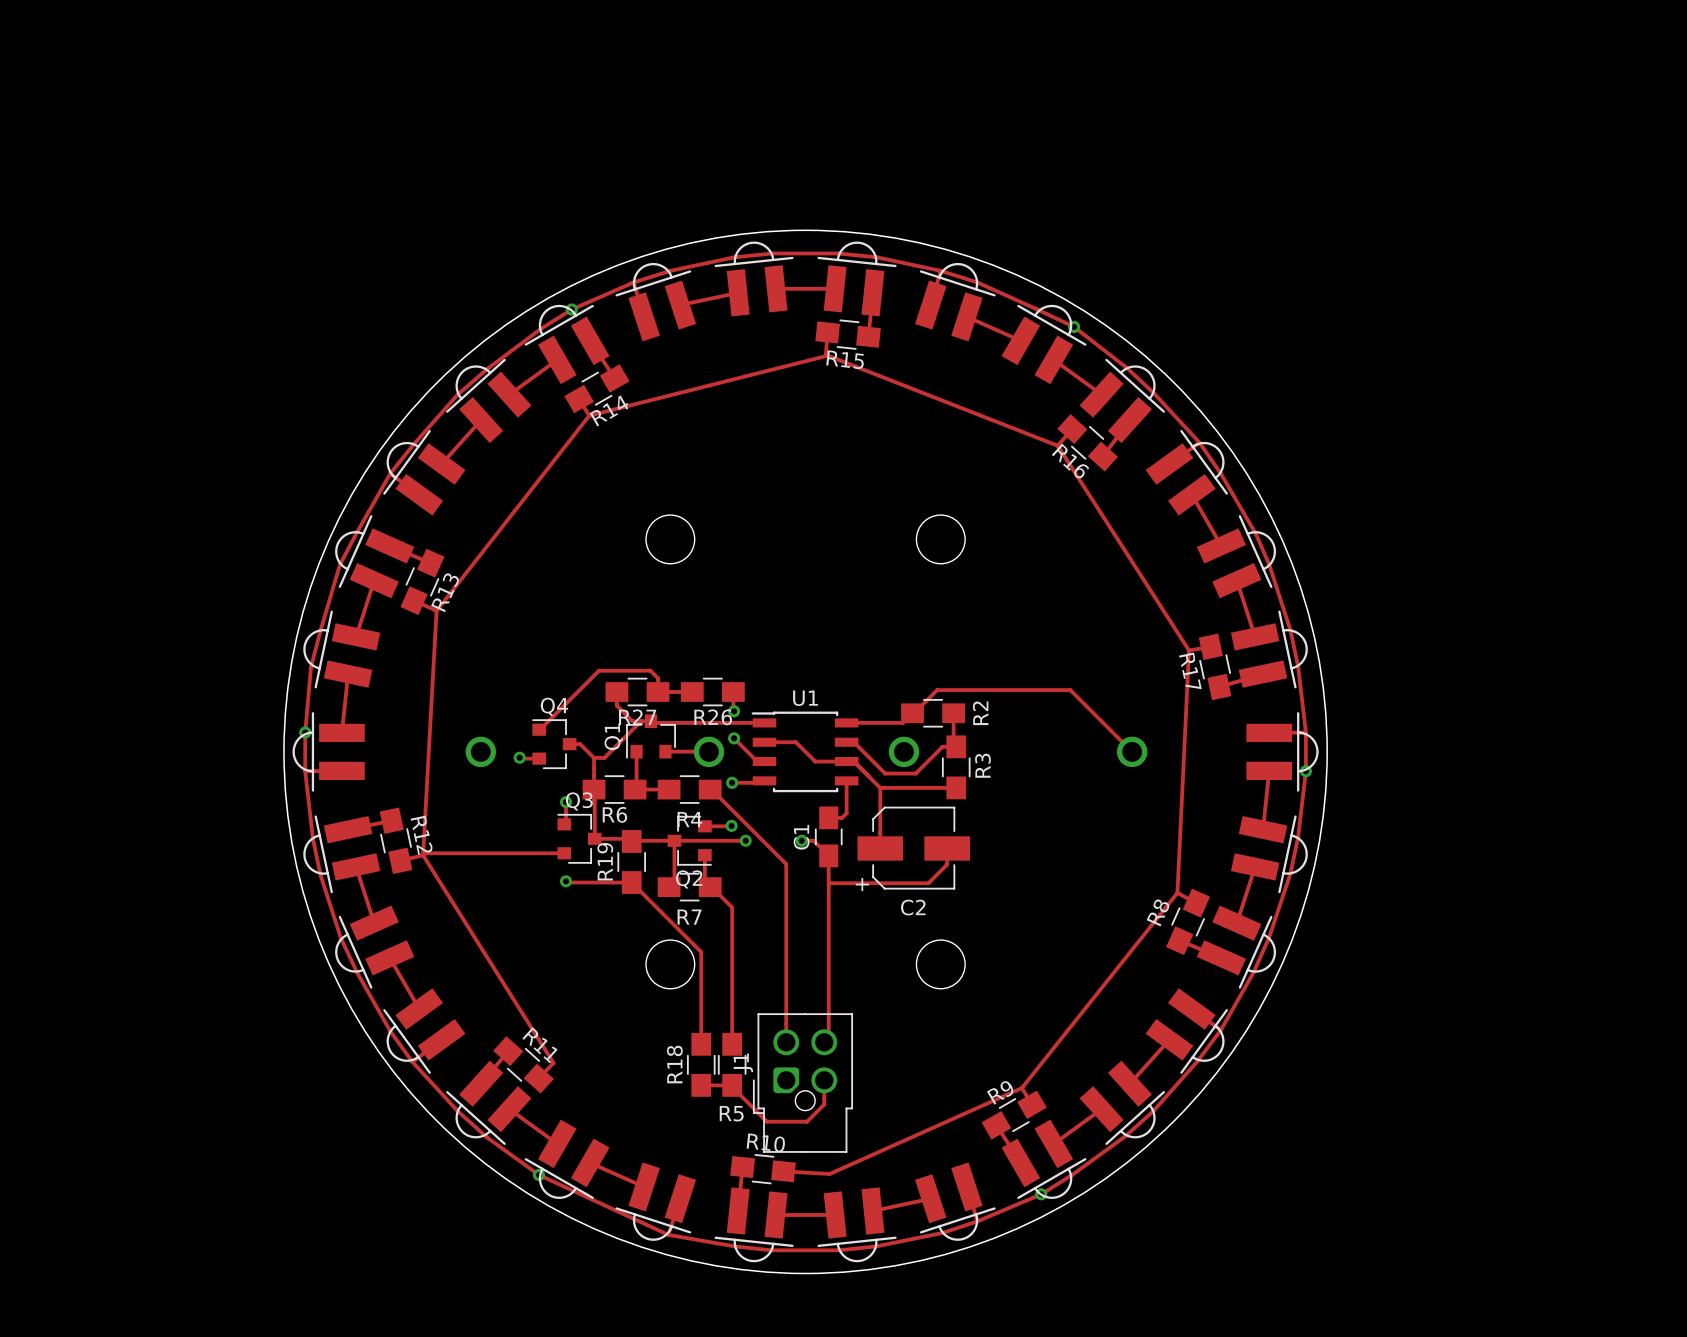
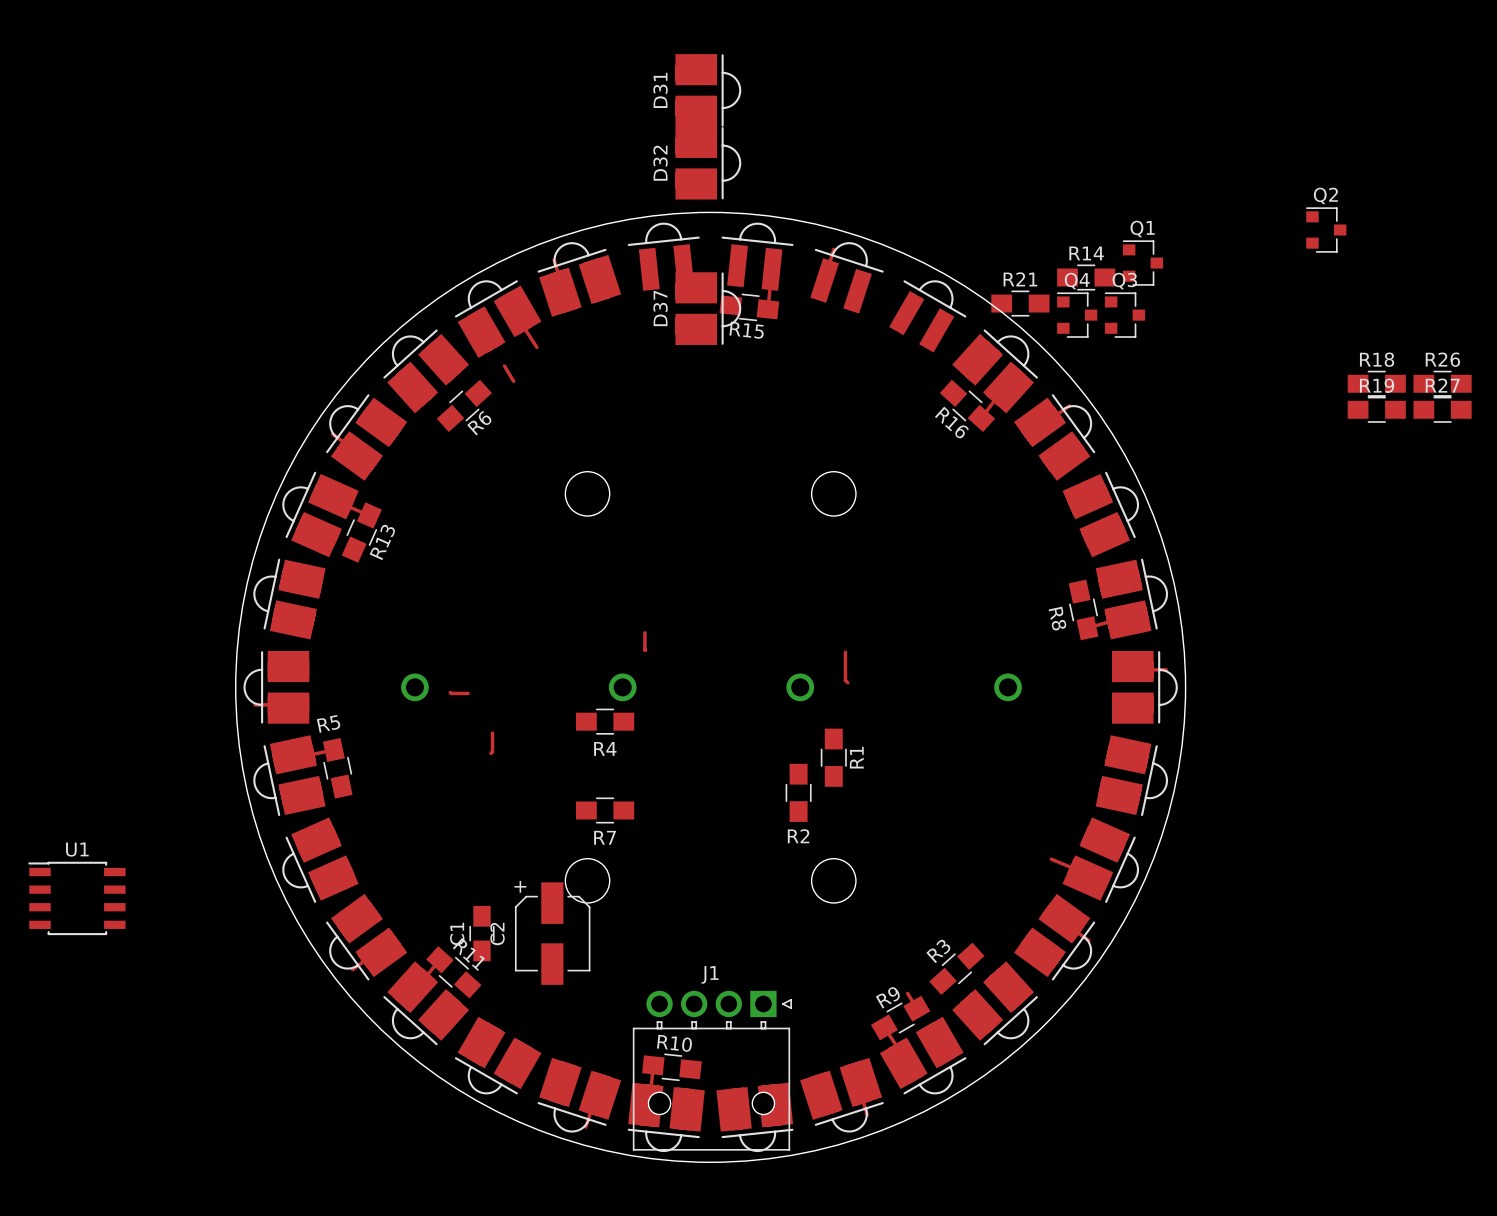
D31: none -> (708, 90)
D32: none -> (708, 163)
track: (772, 253) (734, 257) (670, 270) (633, 282) (571, 309) (540, 328) (486, 369) (457, 394) (390, 473) (340, 564) (311, 666) (305, 732) (305, 771) (312, 838) (320, 875) (340, 938) (357, 973) (390, 1031) (412, 1061) (457, 1111) (486, 1137) (538, 1174) (668, 1234) (735, 1246) (771, 1250) (839, 1250) (876, 1246) (942, 1232) (977, 1221) (1041, 1194) (1072, 1174) (1125, 1136) (1153, 1111) (1197, 1060) (1220, 1030) (1253, 972) (1269, 937) (1290, 873) (1298, 836) (1305, 771) (1305, 732) (1298, 666) (1290, 630) (1269, 564) (1255, 533) (1220, 473) (1199, 442) (1153, 392) (1126, 367) (1074, 326) (977, 282) (940, 270) (877, 257) (838, 253) (772, 253) -> none
part footprint: [615, 262, 697, 342] -> [537, 242, 622, 317]
track: (776, 288) (835, 288) -> none
track: (738, 292) (680, 305) -> none
part footprint: [524, 304, 610, 385] -> [454, 280, 542, 358]
via: (571, 309) -> none
track: (966, 316) (1020, 340) -> none
via: (1074, 326) -> none
R21: none -> (1020, 303)
track: (827, 332) (825, 354) (1057, 445) -> none
D37: none -> (708, 308)
track: (827, 355) (589, 415) (436, 610) -> none
part footprint: [446, 358, 532, 444] -> [383, 329, 470, 414]
part footprint: [1079, 358, 1166, 444] -> [952, 329, 1038, 414]
track: (557, 359) (509, 394) -> none
track: (1053, 359) (1101, 394) -> none
R14 rotation: 0° (596, 388) -> 30° clockwise (1086, 277)
R14 position: (596, 388) -> (1086, 277)
R14 name position: R14 (609, 410) -> R14 (1086, 253)
track: (481, 420) (441, 464) -> none
part footprint: [383, 429, 466, 516] -> [326, 394, 408, 481]
track: (1072, 429) (1057, 445) -> none
part footprint: [1145, 429, 1228, 516] -> [1014, 394, 1096, 481]
track: (1057, 445) (1189, 650) -> none
track: (1191, 494) (1221, 545) -> none
part footprint: [335, 515, 415, 599] -> [282, 471, 359, 558]
part footprint: [1196, 515, 1277, 599] -> [1062, 471, 1140, 558]
track: (374, 580) (356, 636) -> none
track: (1236, 580) (1255, 636) -> none
track: (414, 600) (436, 610) -> none
part footprint: [303, 610, 381, 689] -> [253, 558, 326, 640]
track: (436, 610) (423, 855) -> none
part footprint: [1230, 610, 1308, 689] -> [1095, 558, 1169, 640]
track: (1210, 646) (1189, 650) -> none
track: (1189, 650) (1177, 892) -> none
R17 name: R17 (1190, 670) -> R8 (1057, 618)
track: (348, 674) (341, 732) -> none
track: (616, 692) (616, 705) (632, 721) (764, 722) -> none
R27 position: (637, 692) -> (1442, 409)
track: (692, 692) (658, 692) (658, 678) (650, 670) (598, 670) (539, 729) -> none
R26 position: (712, 692) -> (1442, 383)
via: (734, 711) -> none
part footprint: [292, 712, 365, 792] -> [243, 650, 310, 724]
part footprint: [1246, 712, 1319, 792] -> [1112, 650, 1178, 724]
R2 rotation: 0° (933, 713) -> 90° clockwise (798, 792)
R2 position: (933, 713) -> (798, 792)
R27 name position: R27 (637, 717) -> R27 (1442, 385)
R26 name position: R26 (713, 717) -> R26 (1442, 359)
track: (641, 721) (604, 757) (594, 757) -> none
track: (846, 722) (902, 722) (937, 690) (1070, 690) (1132, 751) -> none
via: (305, 732) -> none
Q1 rotation: 0° (651, 736) -> 90° clockwise (1142, 263)
Q1 position: (651, 736) -> (1142, 263)
via: (734, 738) -> none
track: (736, 738) (757, 761) (764, 761) -> none
track: (764, 742) (795, 742) (815, 761) (853, 761) (880, 787) (880, 848) -> none
track: (846, 742) (853, 742) (885, 773) (915, 773) (942, 746) (956, 746) (956, 748) -> none
Q4 position: (554, 744) -> (1077, 315)
track: (569, 744) (580, 744) (594, 757) -> none
track: (636, 751) (635, 789) (669, 789) -> none
track: (665, 751) (708, 751) -> none
U1 position: (805, 751) -> (76, 898)
via: (519, 757) -> none
track: (594, 757) (594, 803) -> none
R3 name position: R3 (982, 765) -> R3 (938, 951)
R3 rotation: 0° (956, 767) -> 48° clockwise (956, 968)
R3 position: (956, 767) -> (956, 968)
track: (1269, 770) (1263, 829) -> none
via: (1305, 771) -> none
track: (764, 780) (762, 782) (732, 782) -> none
track: (846, 780) (846, 813) (842, 817) (828, 817) -> none
via: (732, 782) -> none
track: (880, 787) (956, 787) -> none
track: (594, 789) (594, 838) (629, 838) (631, 841) -> none
R6 rotation: 0° (614, 789) -> 42° counterclockwise (464, 405)
R6 position: (614, 789) -> (464, 405)
track: (710, 789) (786, 864) (786, 1042) -> none
via: (566, 802) -> none
part footprint: [303, 815, 381, 894] -> [253, 735, 326, 817]
part footprint: [1230, 815, 1308, 894] -> [1095, 735, 1169, 817]
track: (731, 825) (704, 826) -> none
via: (731, 825) -> none
R1: none -> (833, 757)
R12 name: R12 (421, 835) -> R5 (328, 723)
C1 position: (828, 836) -> (481, 933)
Q3 position: (579, 838) -> (1124, 315)
track: (631, 840) (745, 840) -> none
track: (674, 840) (674, 881) (669, 887) -> none
Q2 rotation: 0° (689, 840) -> 180° (1326, 230)
Q2 position: (689, 840) -> (1326, 230)
via: (745, 840) -> none
track: (801, 840) (813, 840) (828, 855) (828, 1037) (824, 1042) -> none
via: (801, 840) -> none
C2 rotation: 0° (913, 848) -> 90° clockwise (552, 933)
C2 position: (913, 848) -> (552, 933)
track: (947, 848) (947, 864) (928, 883) (828, 883) -> none
track: (564, 853) (425, 853) (423, 855) -> none
track: (423, 855) (400, 860) -> none
track: (423, 855) (553, 1062) (538, 1078) -> none
track: (704, 855) (704, 881) (732, 907) (732, 1044) -> none
R19 rotation: 0° (631, 862) -> 90° clockwise (1376, 409)
R19 position: (631, 862) -> (1376, 409)
track: (356, 866) (374, 923) -> none
track: (1255, 866) (1236, 923) -> none
track: (566, 881) (631, 882) (701, 952) (701, 1044) -> none
via: (566, 881) -> none
track: (1177, 892) (1196, 903) -> none
track: (1177, 892) (1021, 1088) (829, 1174) (783, 1171) -> none
part footprint: [335, 905, 415, 989] -> [282, 817, 359, 903]
part footprint: [1196, 905, 1277, 989] -> [1062, 817, 1140, 903]
R8: (1188, 921) -> none
track: (389, 957) (419, 1009) -> none
part footprint: [383, 988, 466, 1074] -> [326, 893, 408, 981]
part footprint: [1145, 988, 1228, 1074] -> [1014, 893, 1096, 981]
J1 footprint: [752, 1013, 854, 1153] -> [632, 990, 792, 1151]
track: (1169, 1039) (1129, 1083) -> none
part footprint: [446, 1060, 532, 1145] -> [383, 961, 470, 1046]
part footprint: [1079, 1060, 1166, 1145] -> [952, 961, 1038, 1046]
J1 name position: J1 (743, 1062) -> J1 (710, 974)
R18 rotation: 0° (701, 1064) -> 90° clockwise (1376, 383)
R18 position: (701, 1064) -> (1376, 383)
R5: (732, 1064) -> none
track: (824, 1080) (824, 1104) (807, 1121) (766, 1121) (732, 1085) (701, 1085) -> none
track: (509, 1109) (557, 1143) -> none
track: (1101, 1109) (1053, 1143) -> none
part footprint: [524, 1119, 610, 1199] -> [454, 1016, 542, 1095]
part footprint: [1001, 1119, 1087, 1199] -> [879, 1016, 967, 1095]
track: (590, 1162) (644, 1186) -> none
part footprint: [615, 1162, 697, 1241] -> [537, 1057, 622, 1133]
part footprint: [915, 1162, 996, 1241] -> [800, 1057, 884, 1133]
via: (538, 1174) -> none
part footprint: [714, 1187, 794, 1263] -> [627, 1082, 705, 1153]
part footprint: [817, 1187, 897, 1263] -> [716, 1082, 794, 1153]
via: (1041, 1194) -> none
track: (930, 1198) (872, 1211) -> none
track: (776, 1214) (835, 1214) -> none

